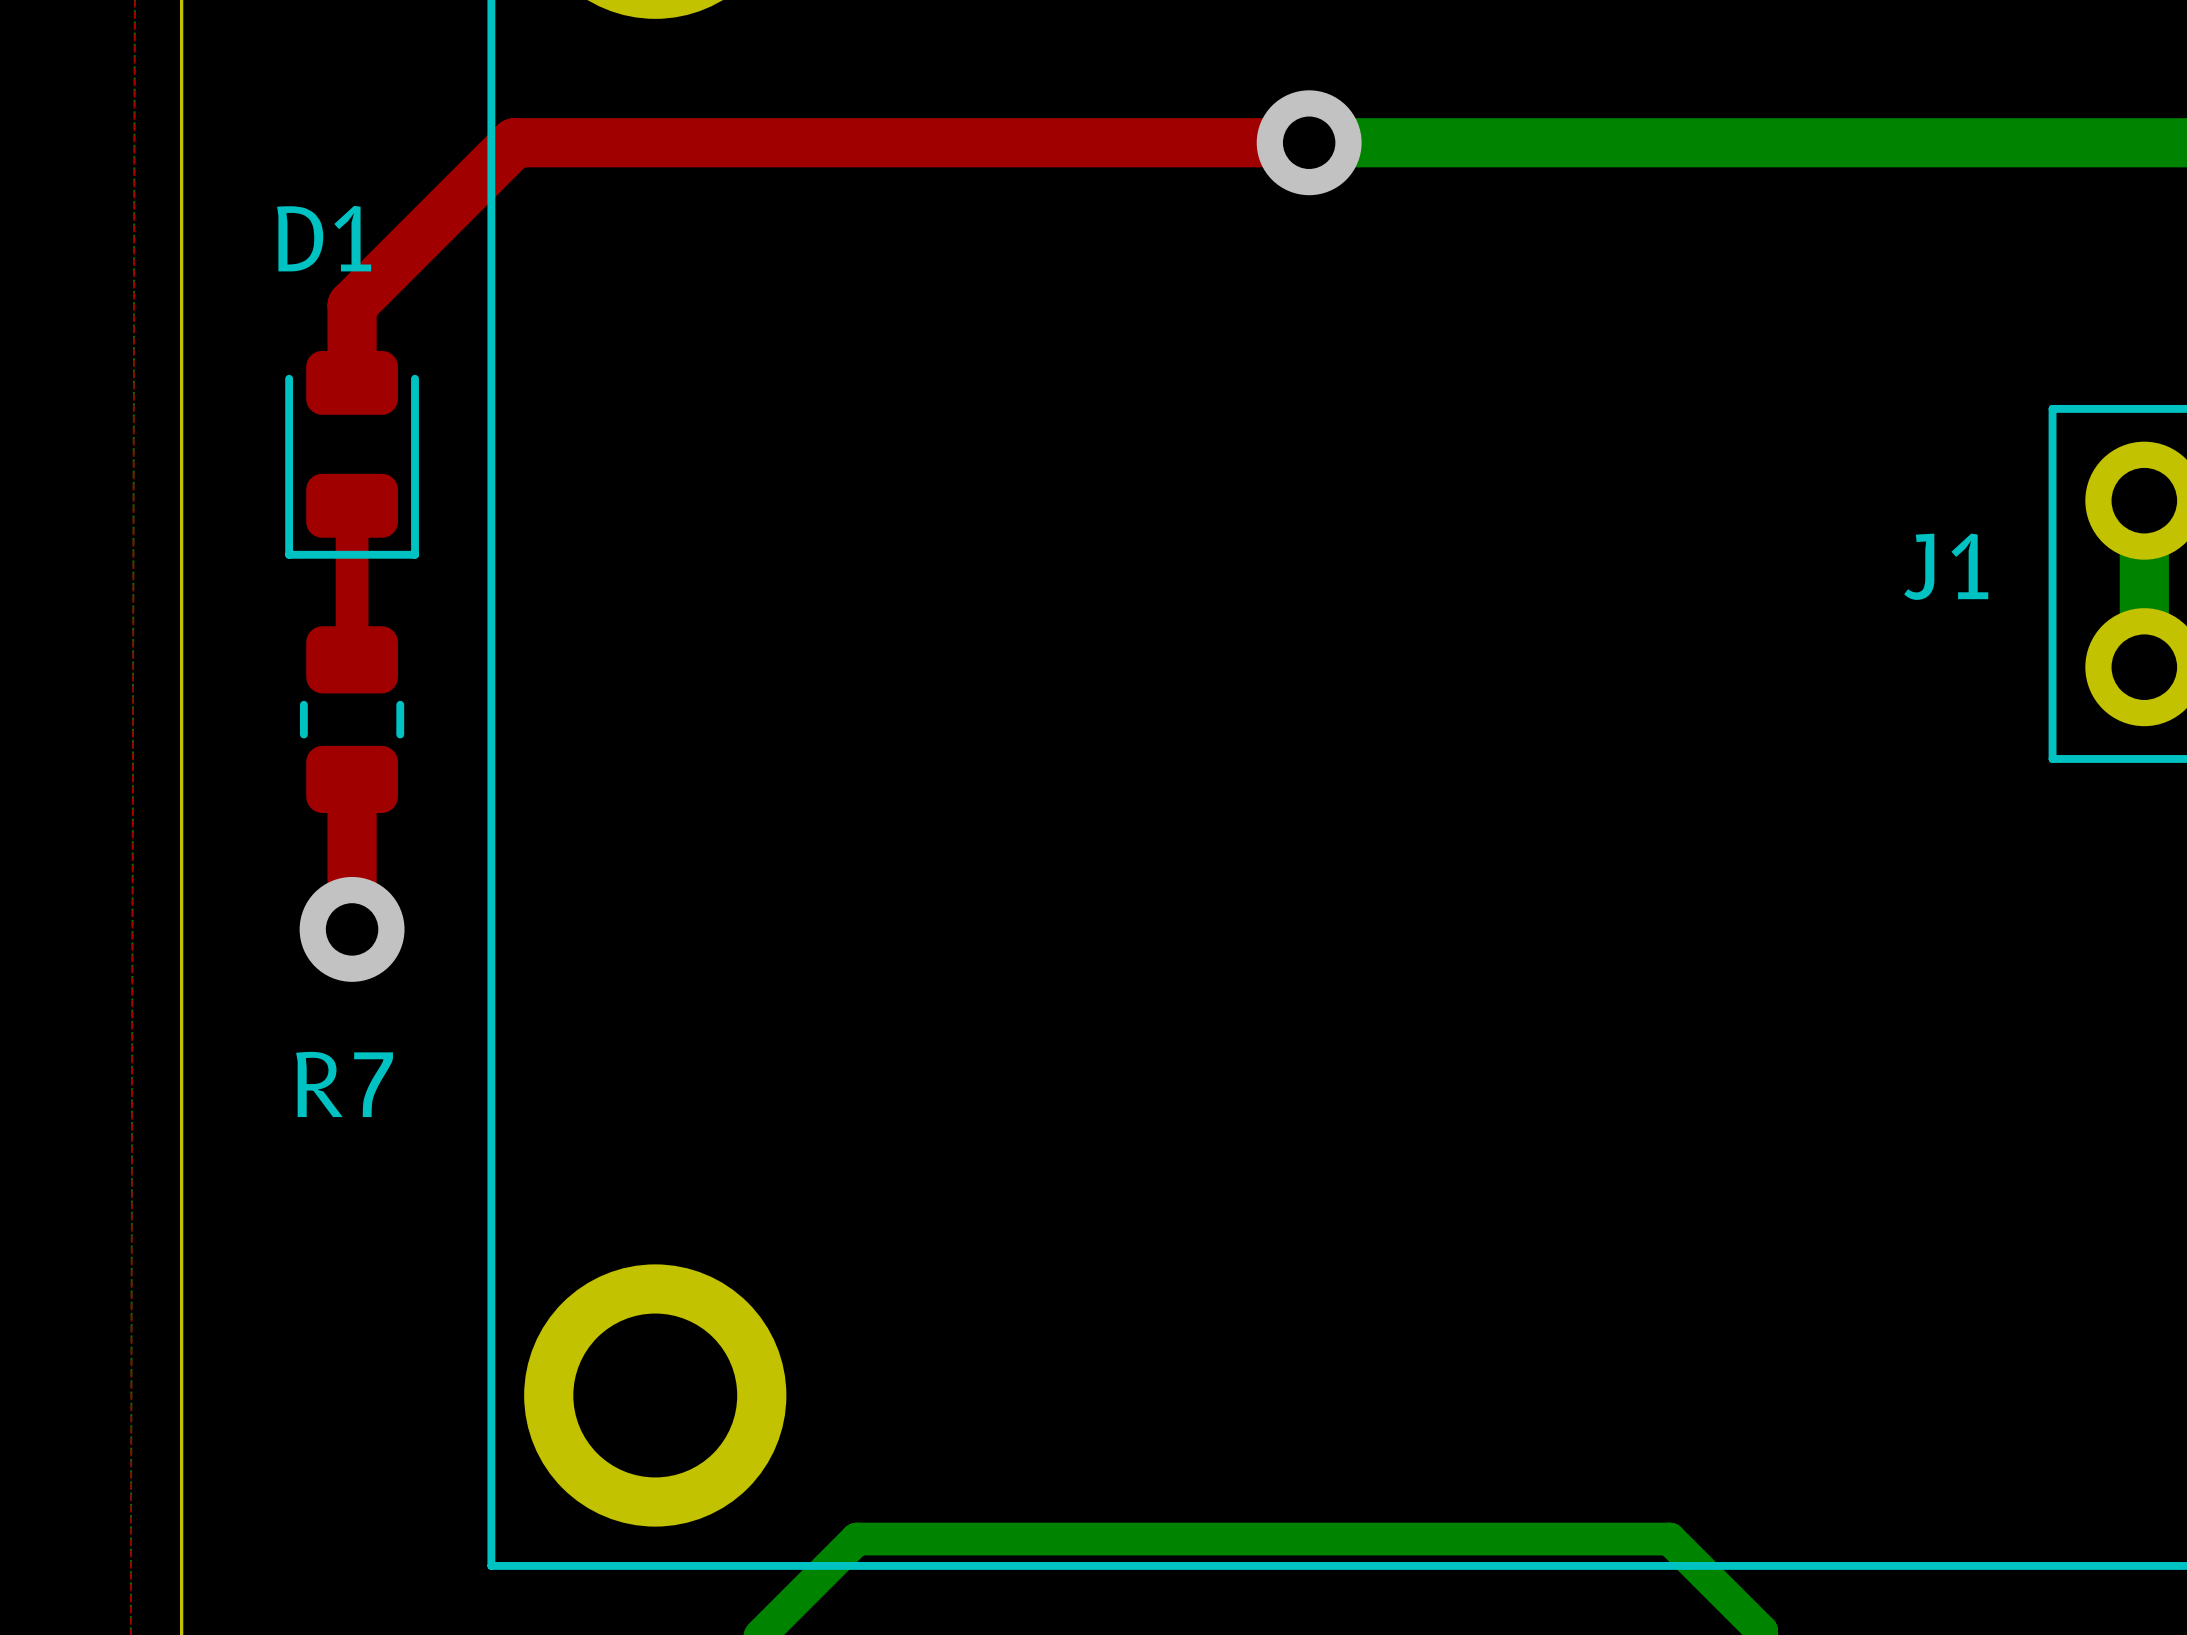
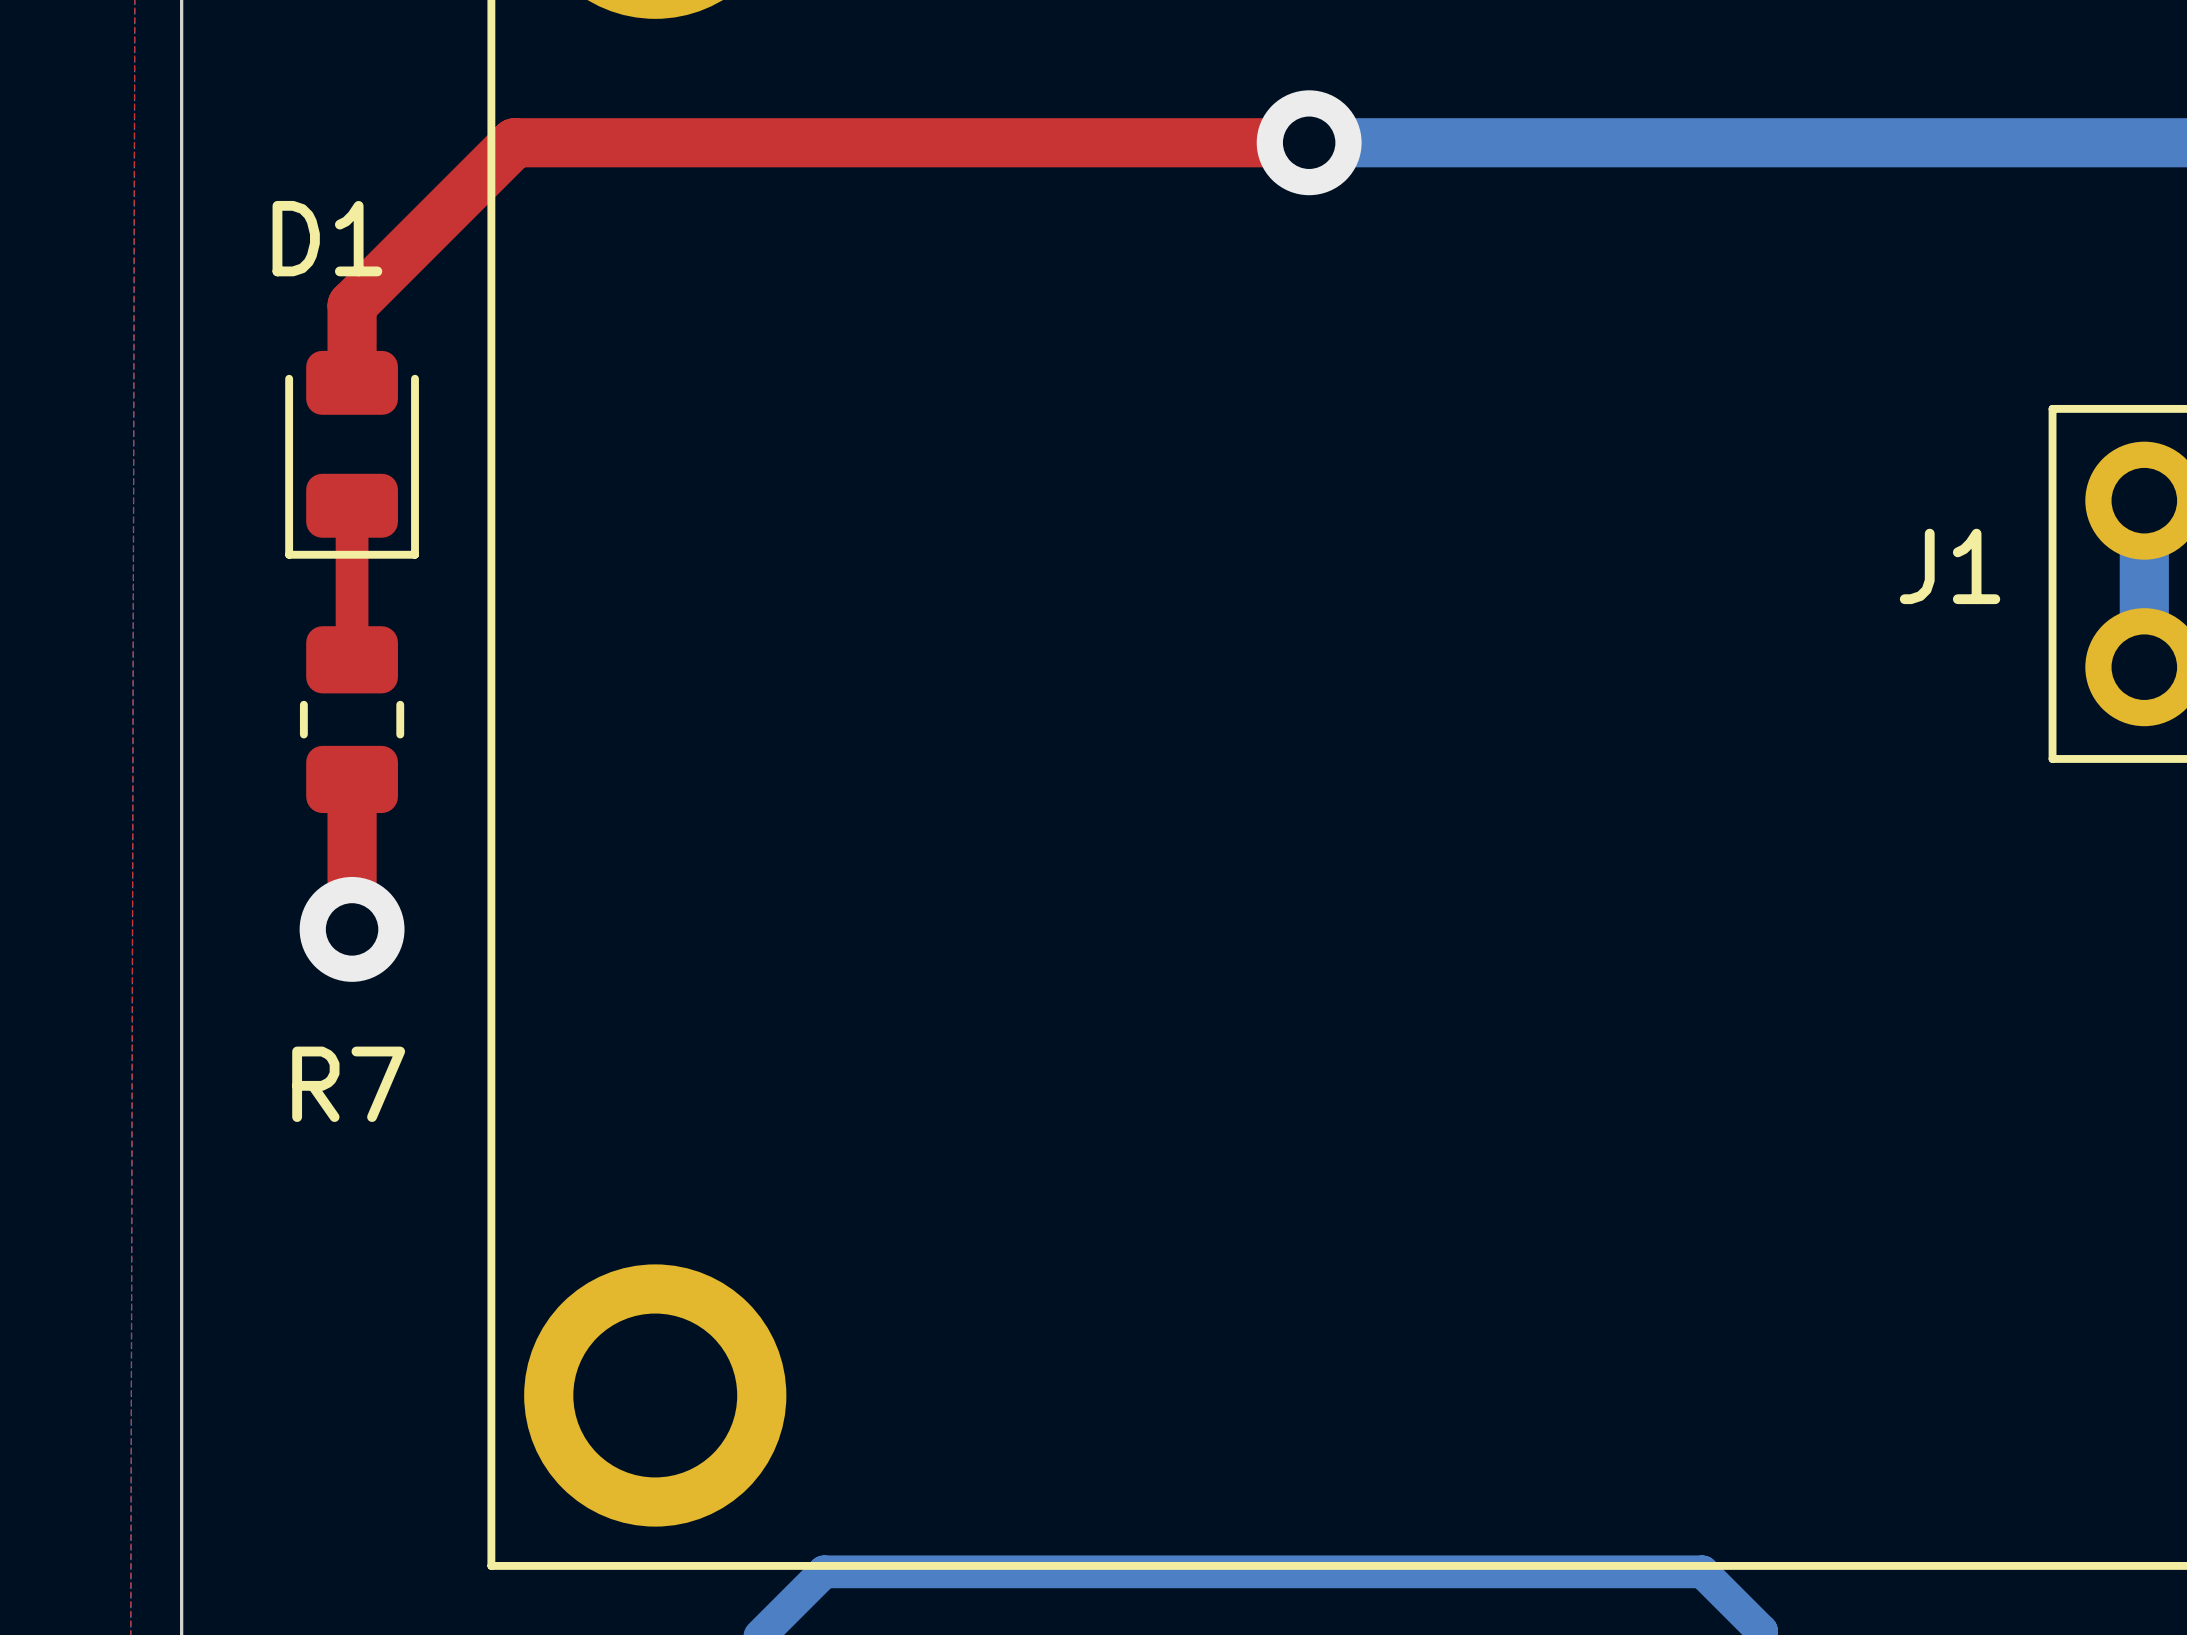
bottom track: (824, 1571) (856, 1539) (1669, 1539) (1702, 1571) -> (824, 1571) (1702, 1571)

